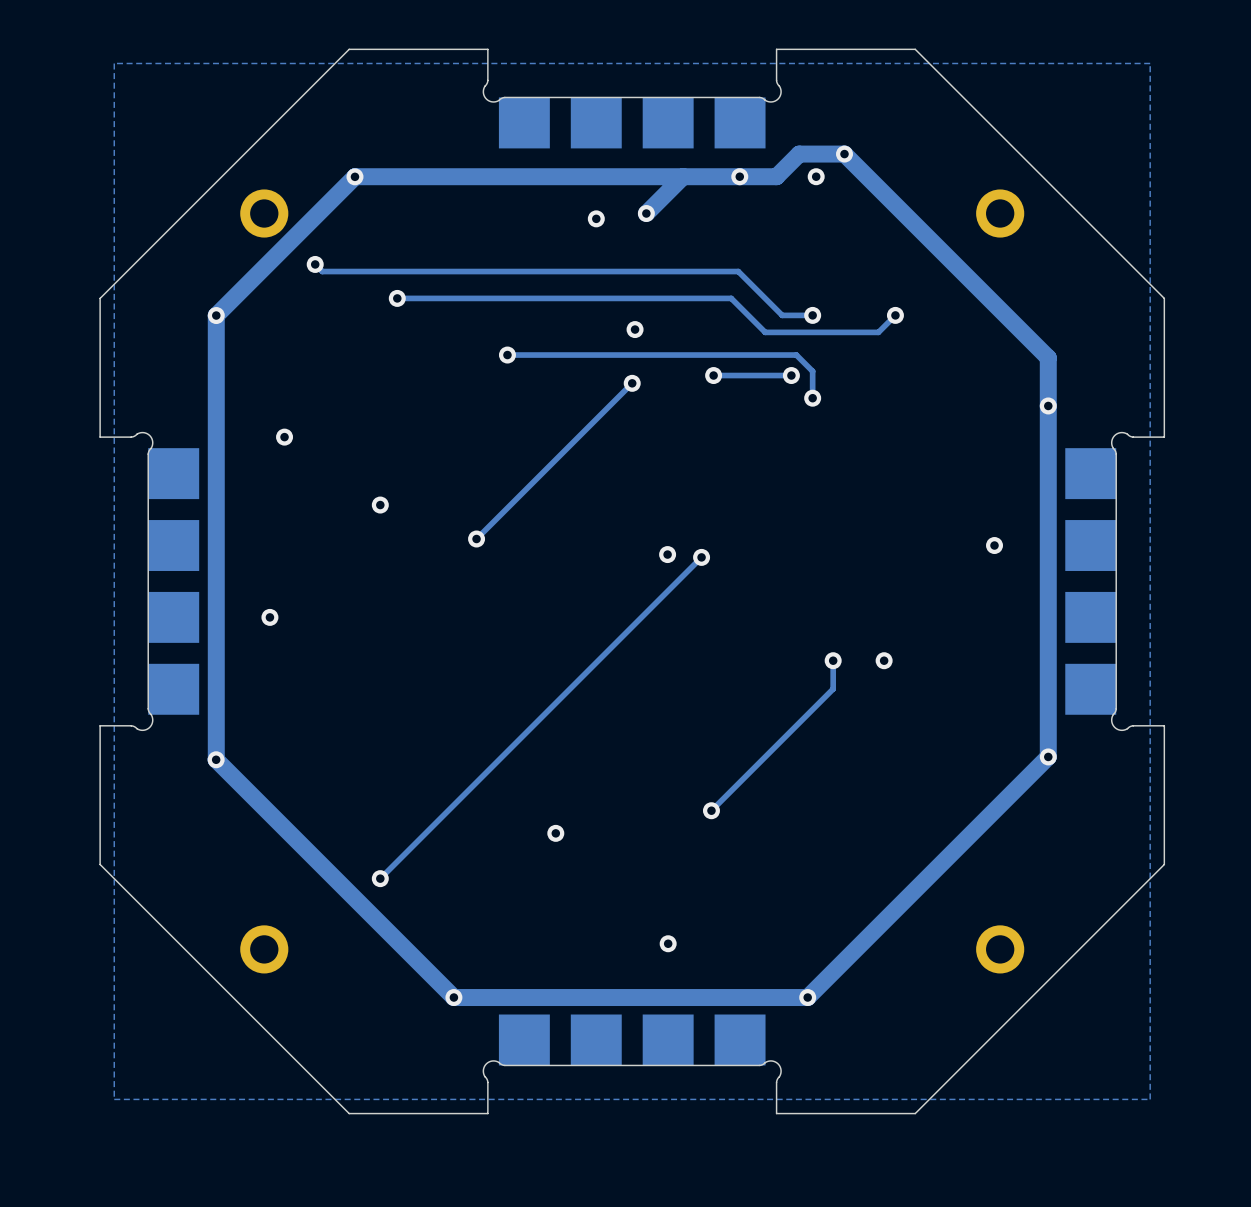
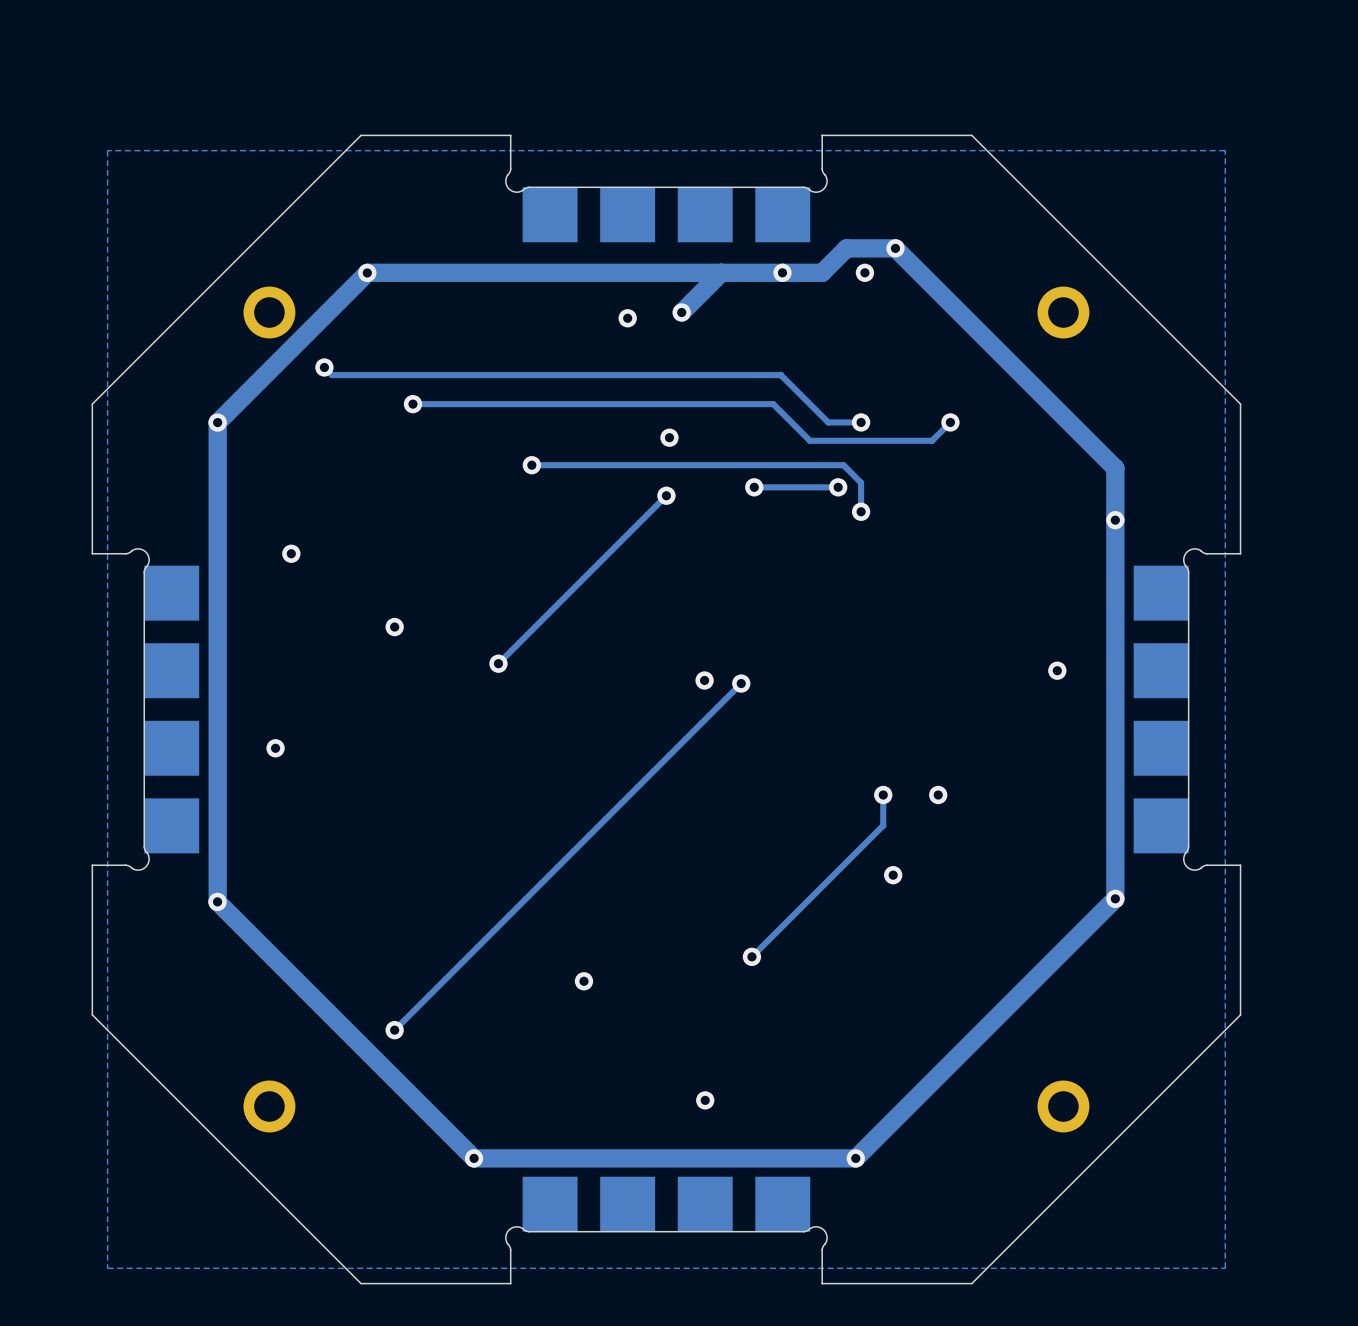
via: none -> (893, 875)

